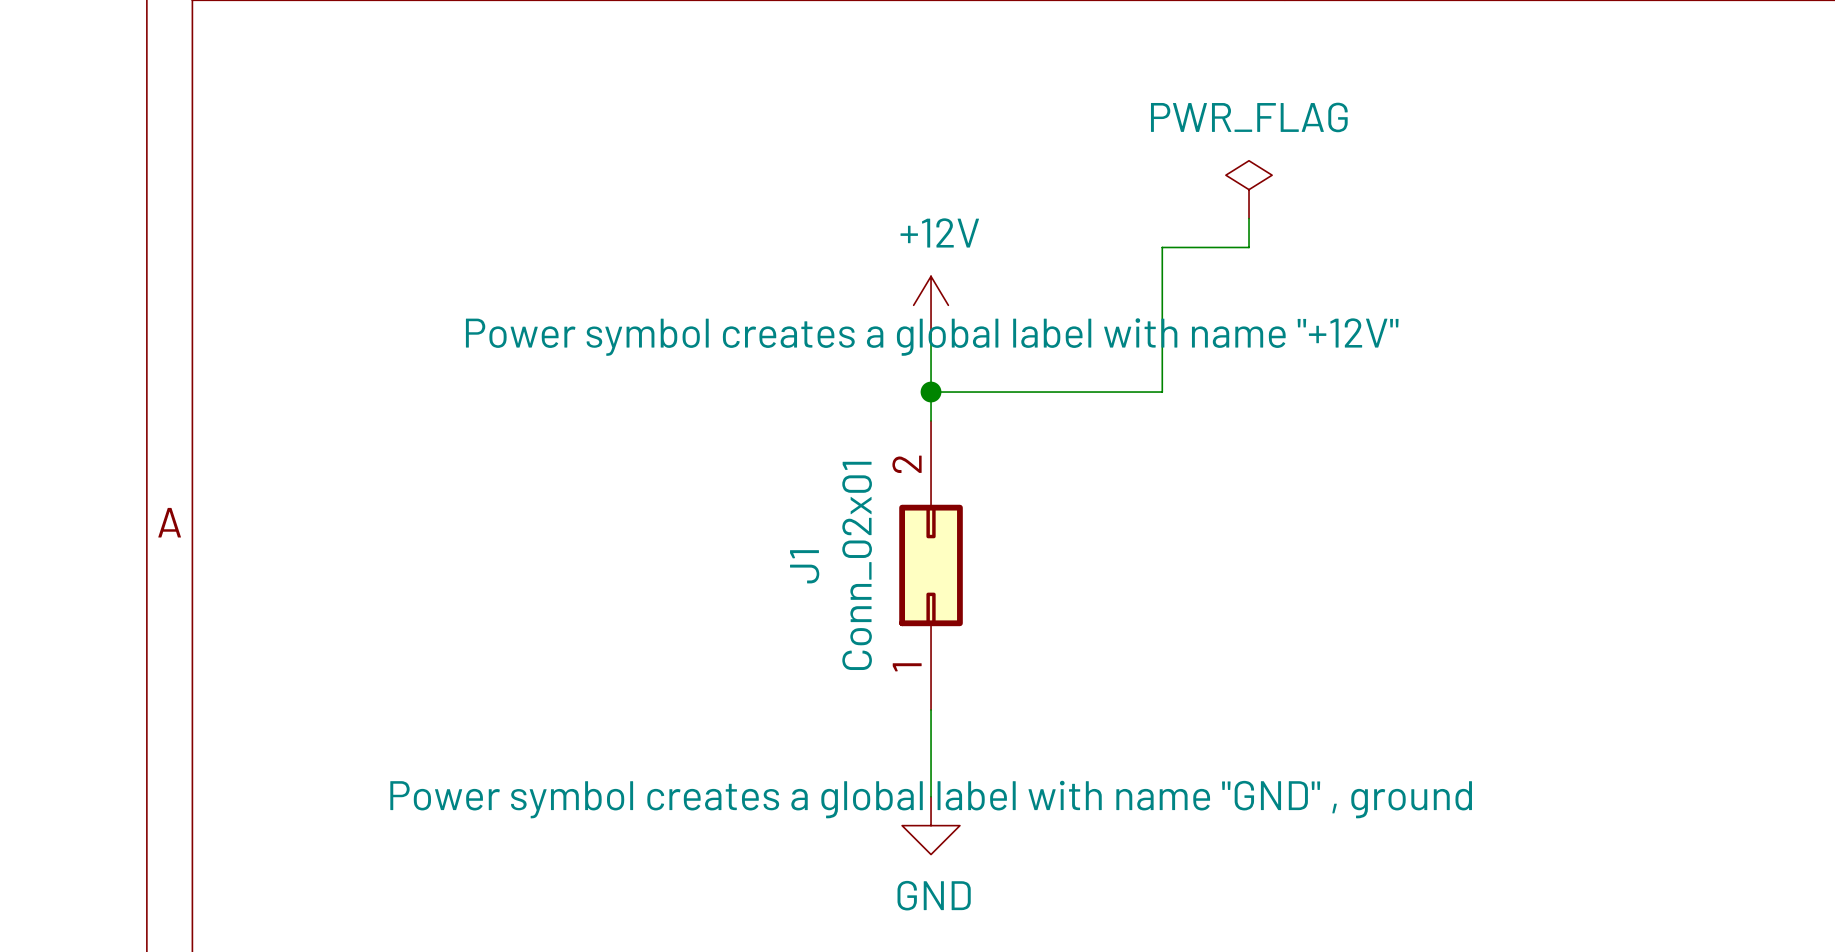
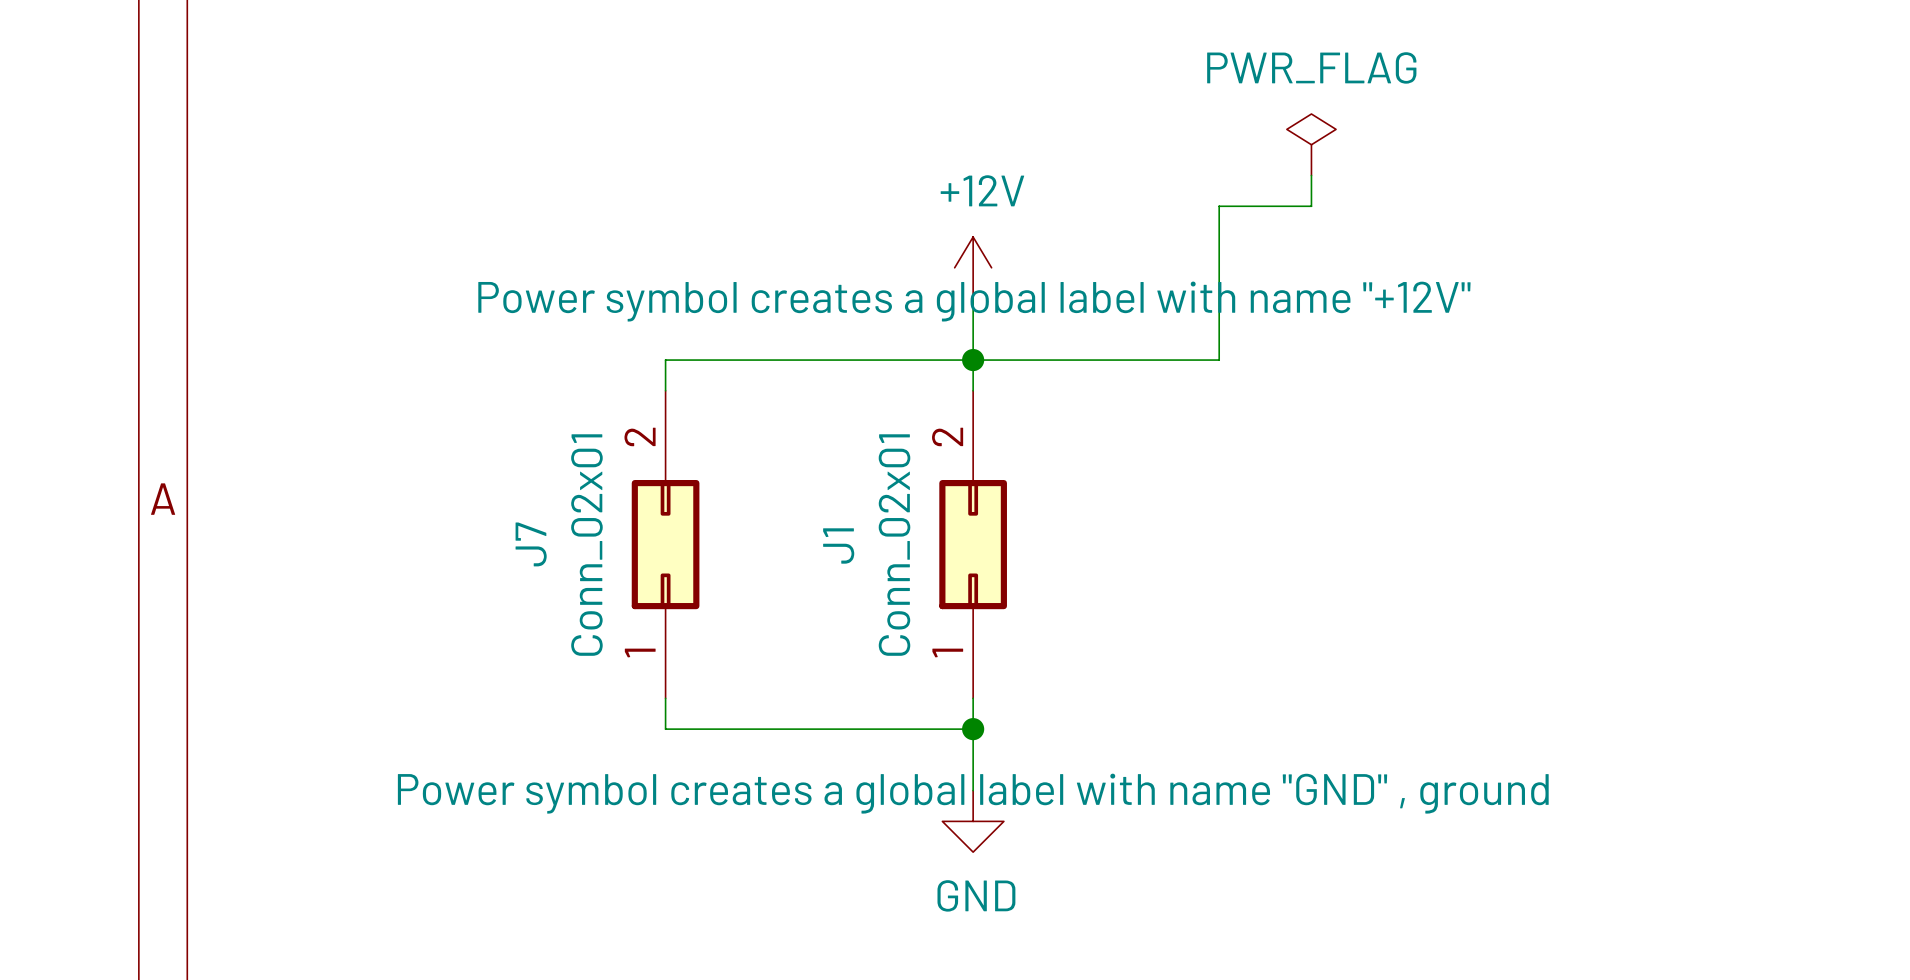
wire: none -> (973, 360) (665, 360) (665, 390)
J7: none -> Conn_02x01 (665, 544)
wire: none -> (665, 698) (665, 729) (973, 729)
junction: none -> (973, 729)

